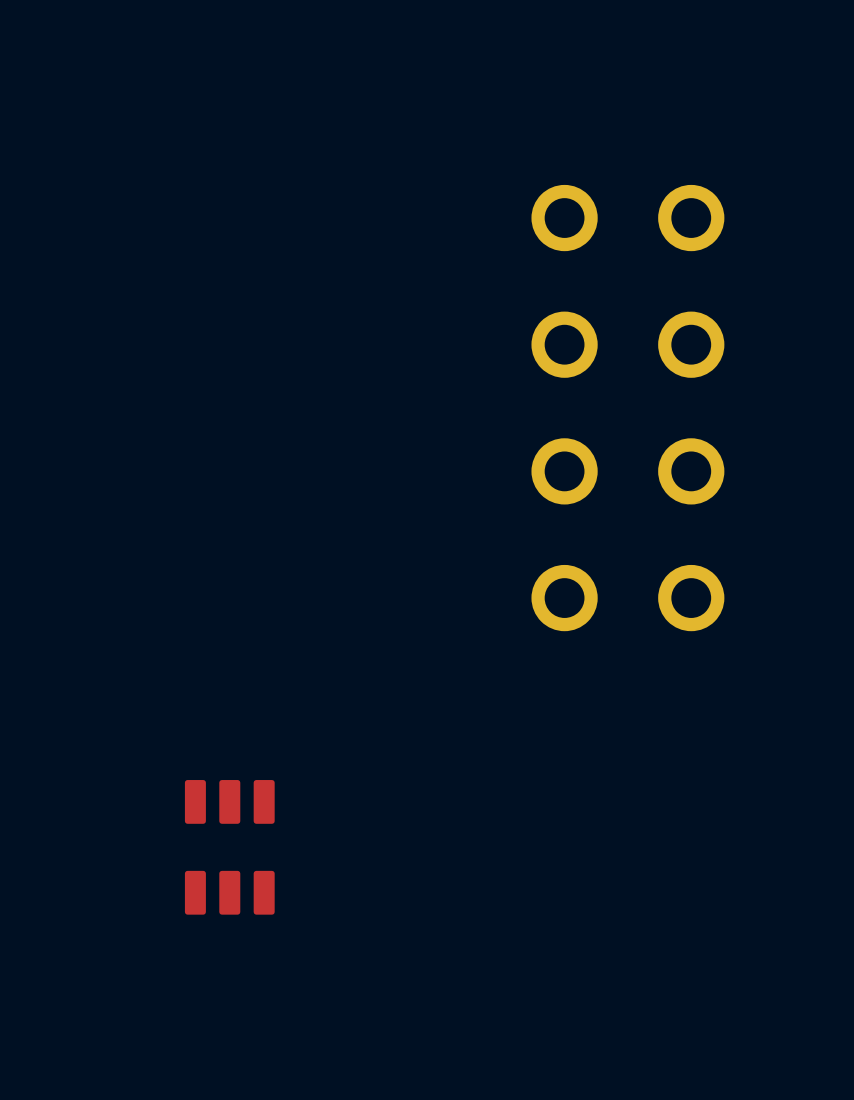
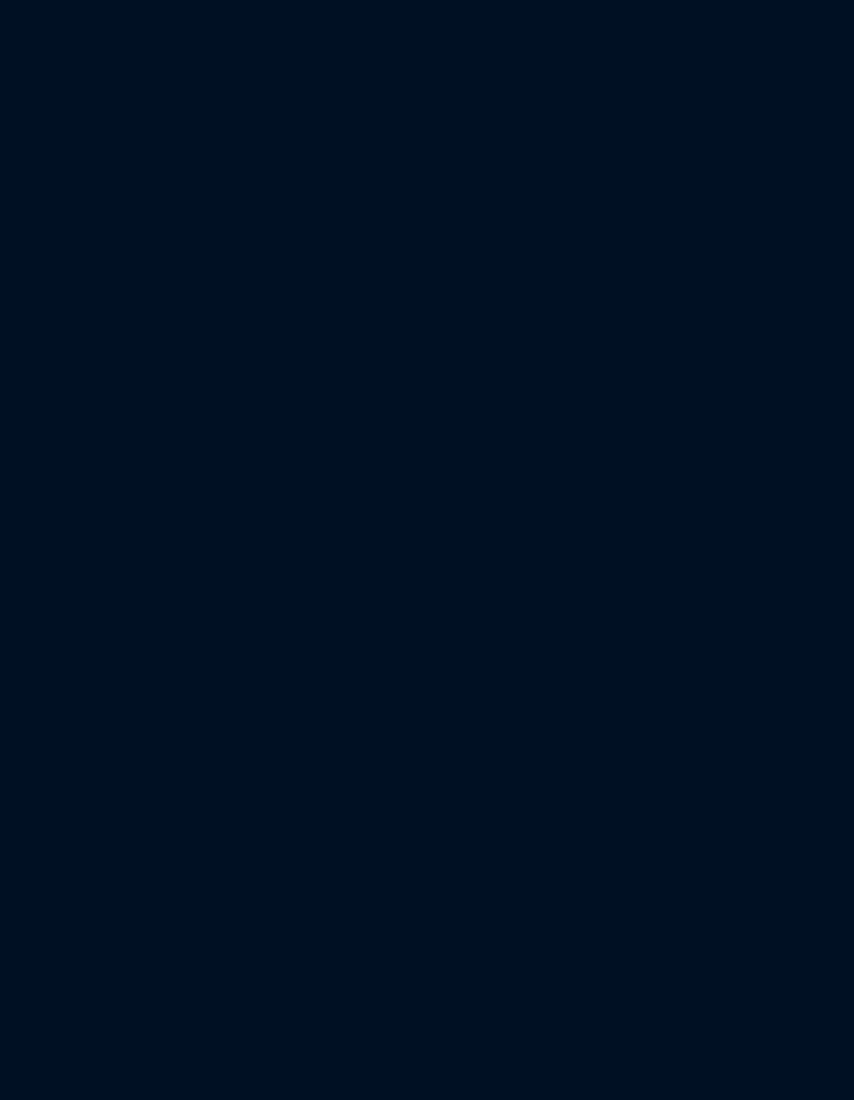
part: (627, 408) -> none
part: (229, 847) -> none

